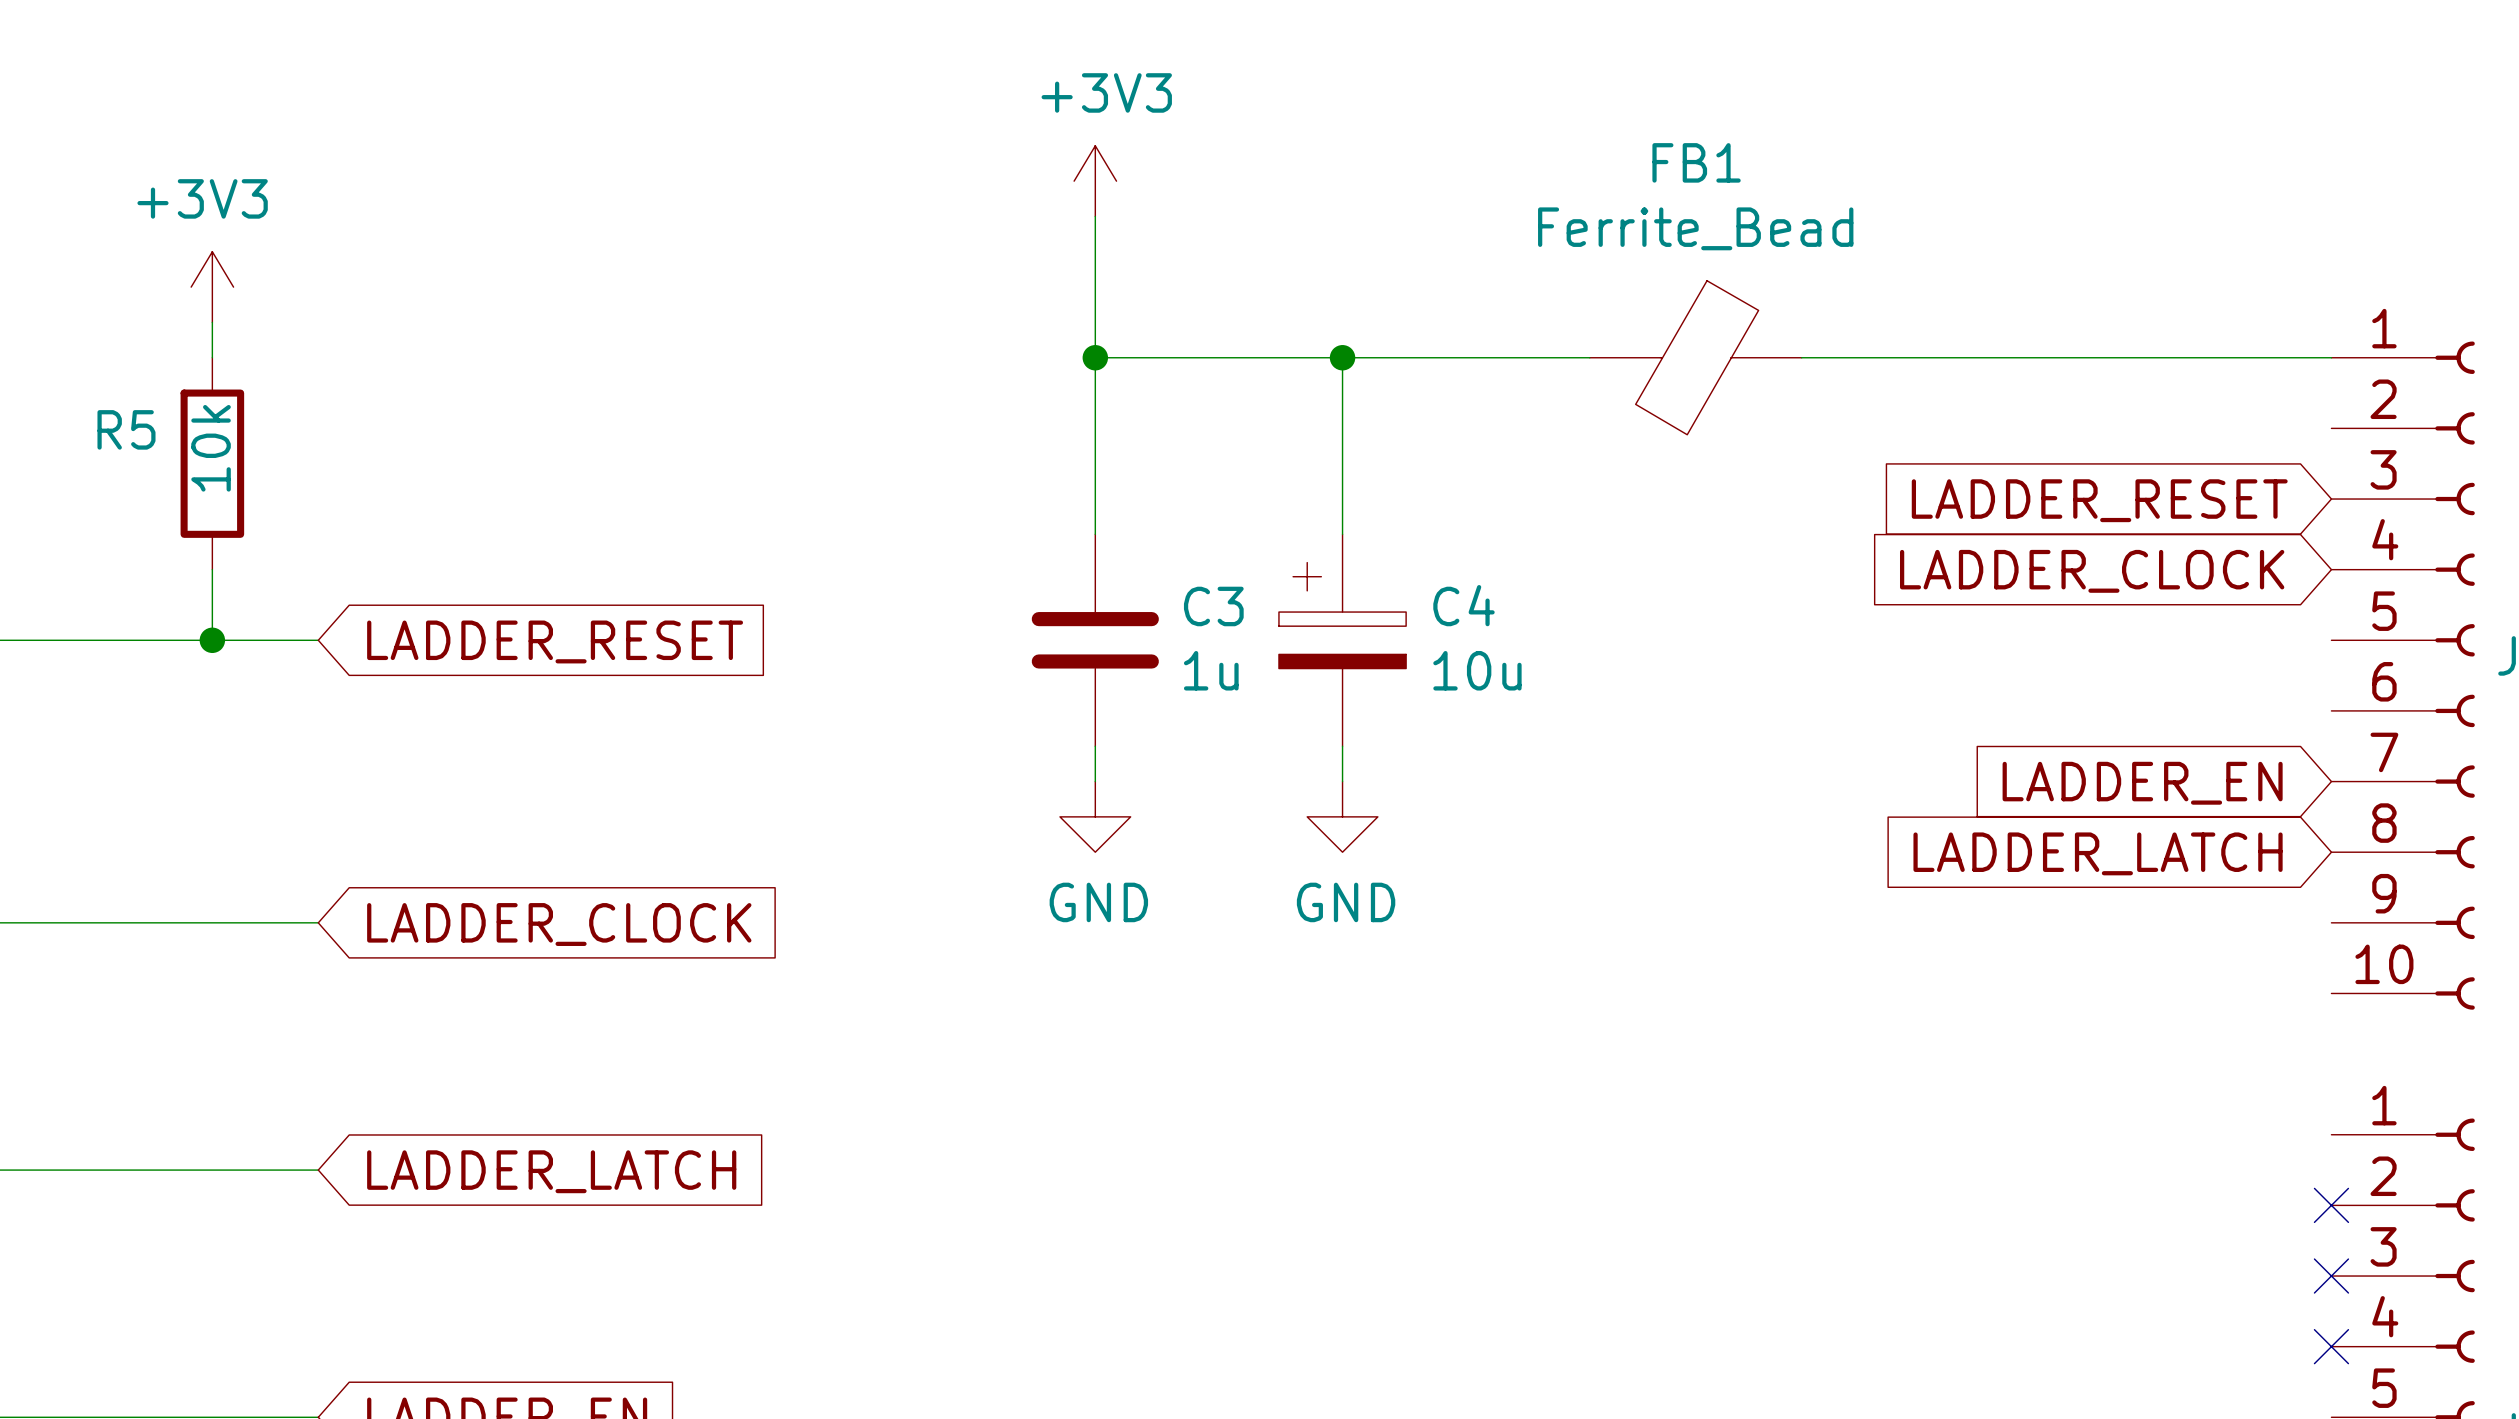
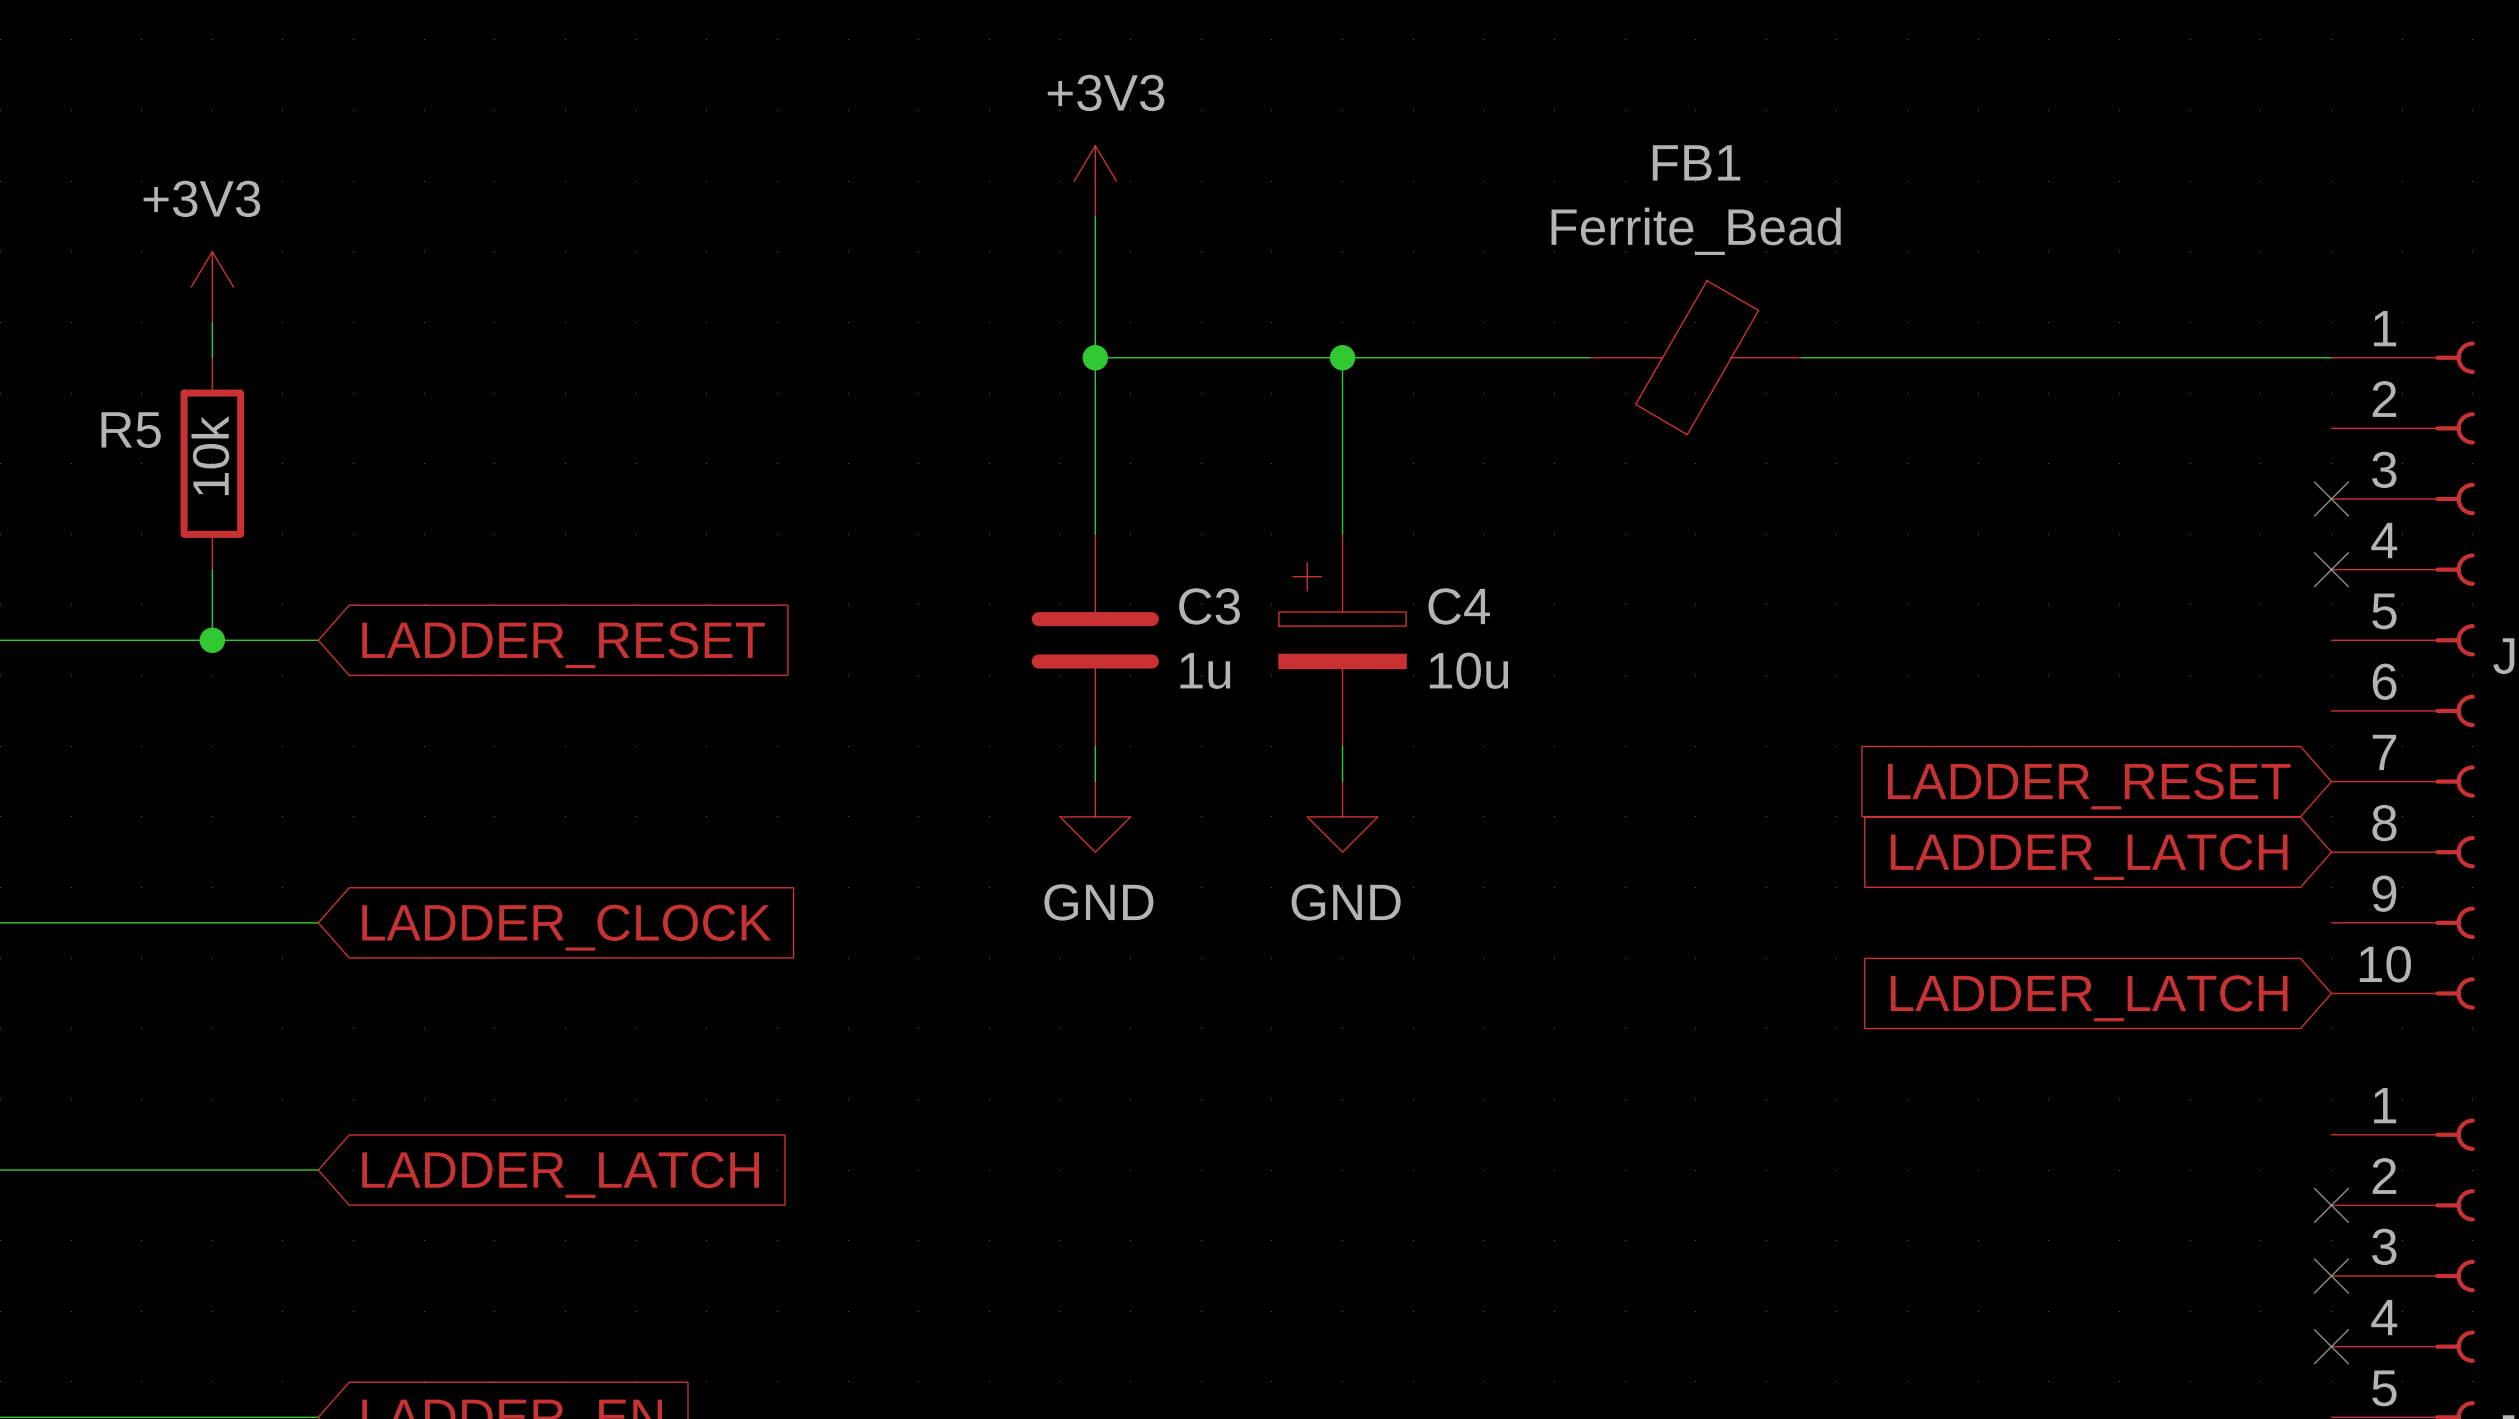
no-connect mark: none -> (2331, 499)
global label: LADDER_RESET (2099, 500) -> none
no-connect mark: none -> (2331, 569)
global label: LADDER_CLOCK (2092, 571) -> none
global label: LADDER_EN (2142, 783) -> LADDER_RESET (2089, 786)
global label: none -> LADDER_LATCH (2089, 998)

